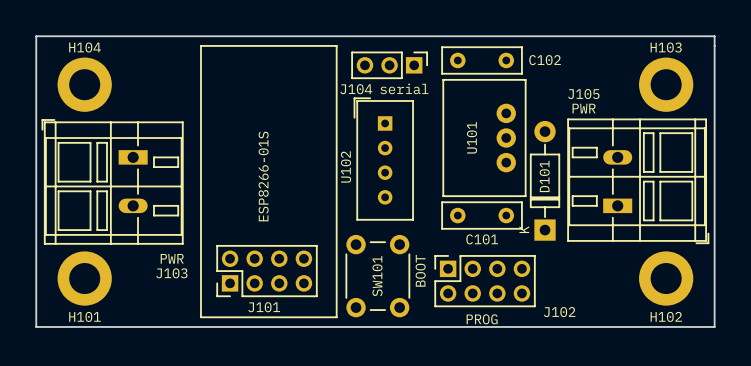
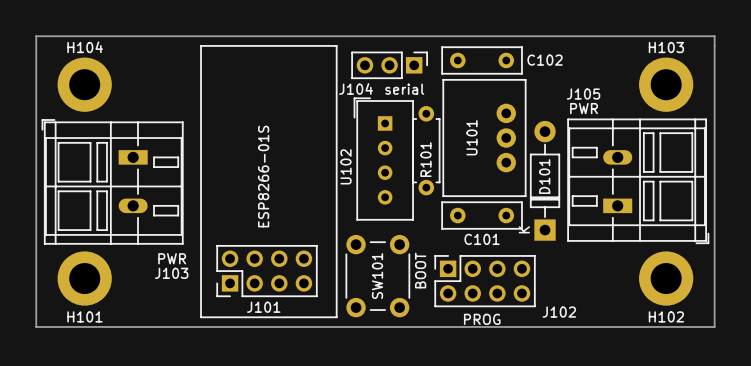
R101: none -> (426, 150)

